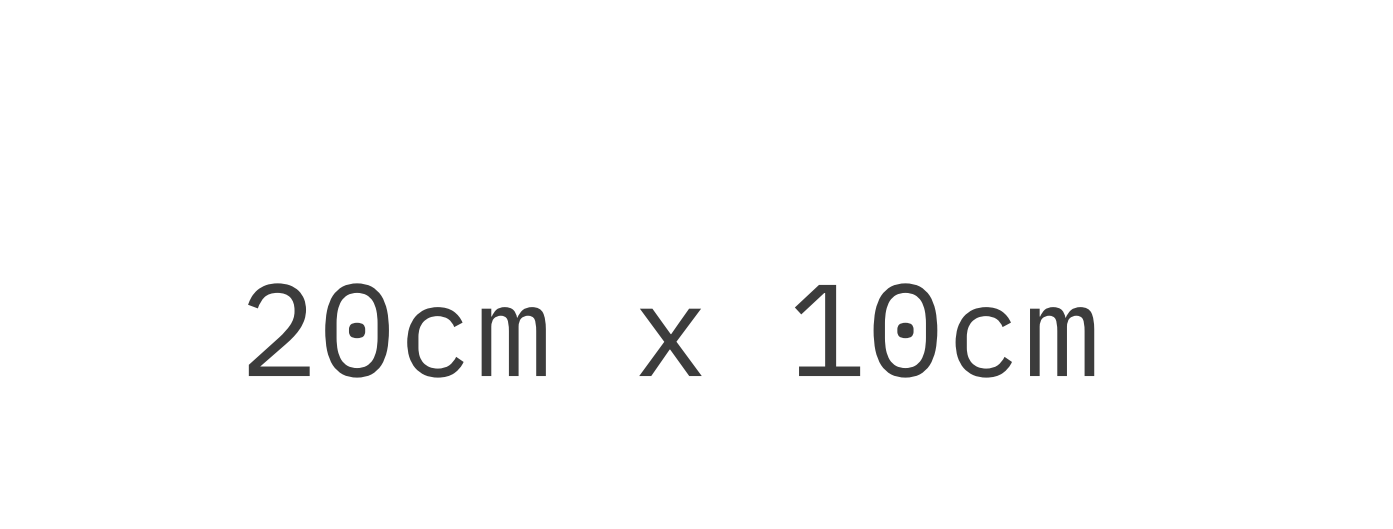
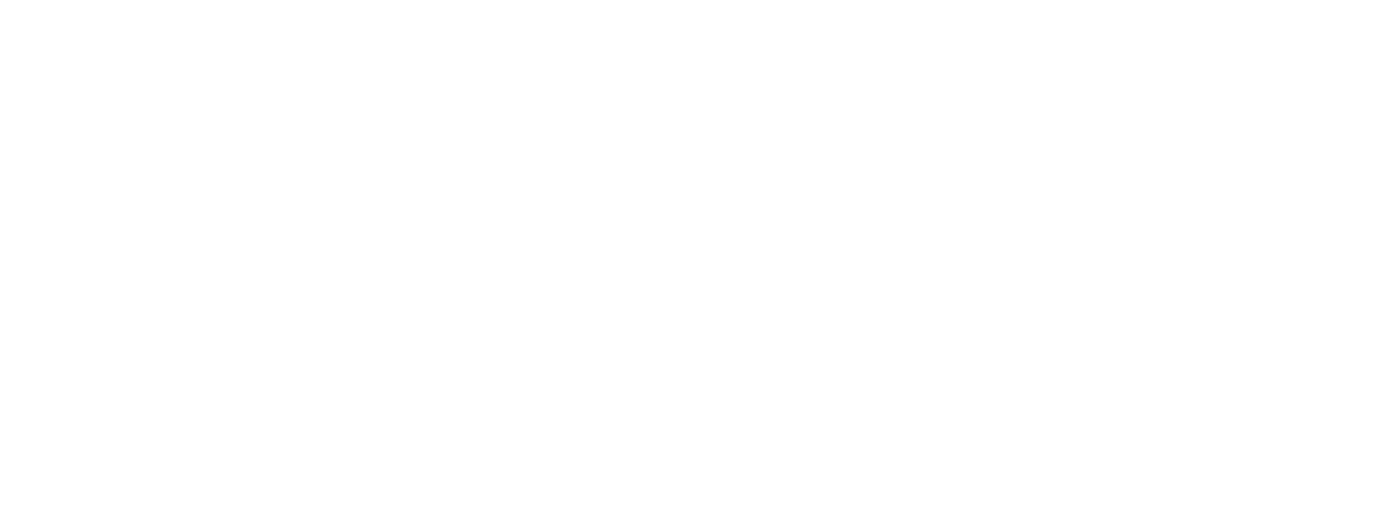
text: 20cm x 10cm (671, 330) -> none

